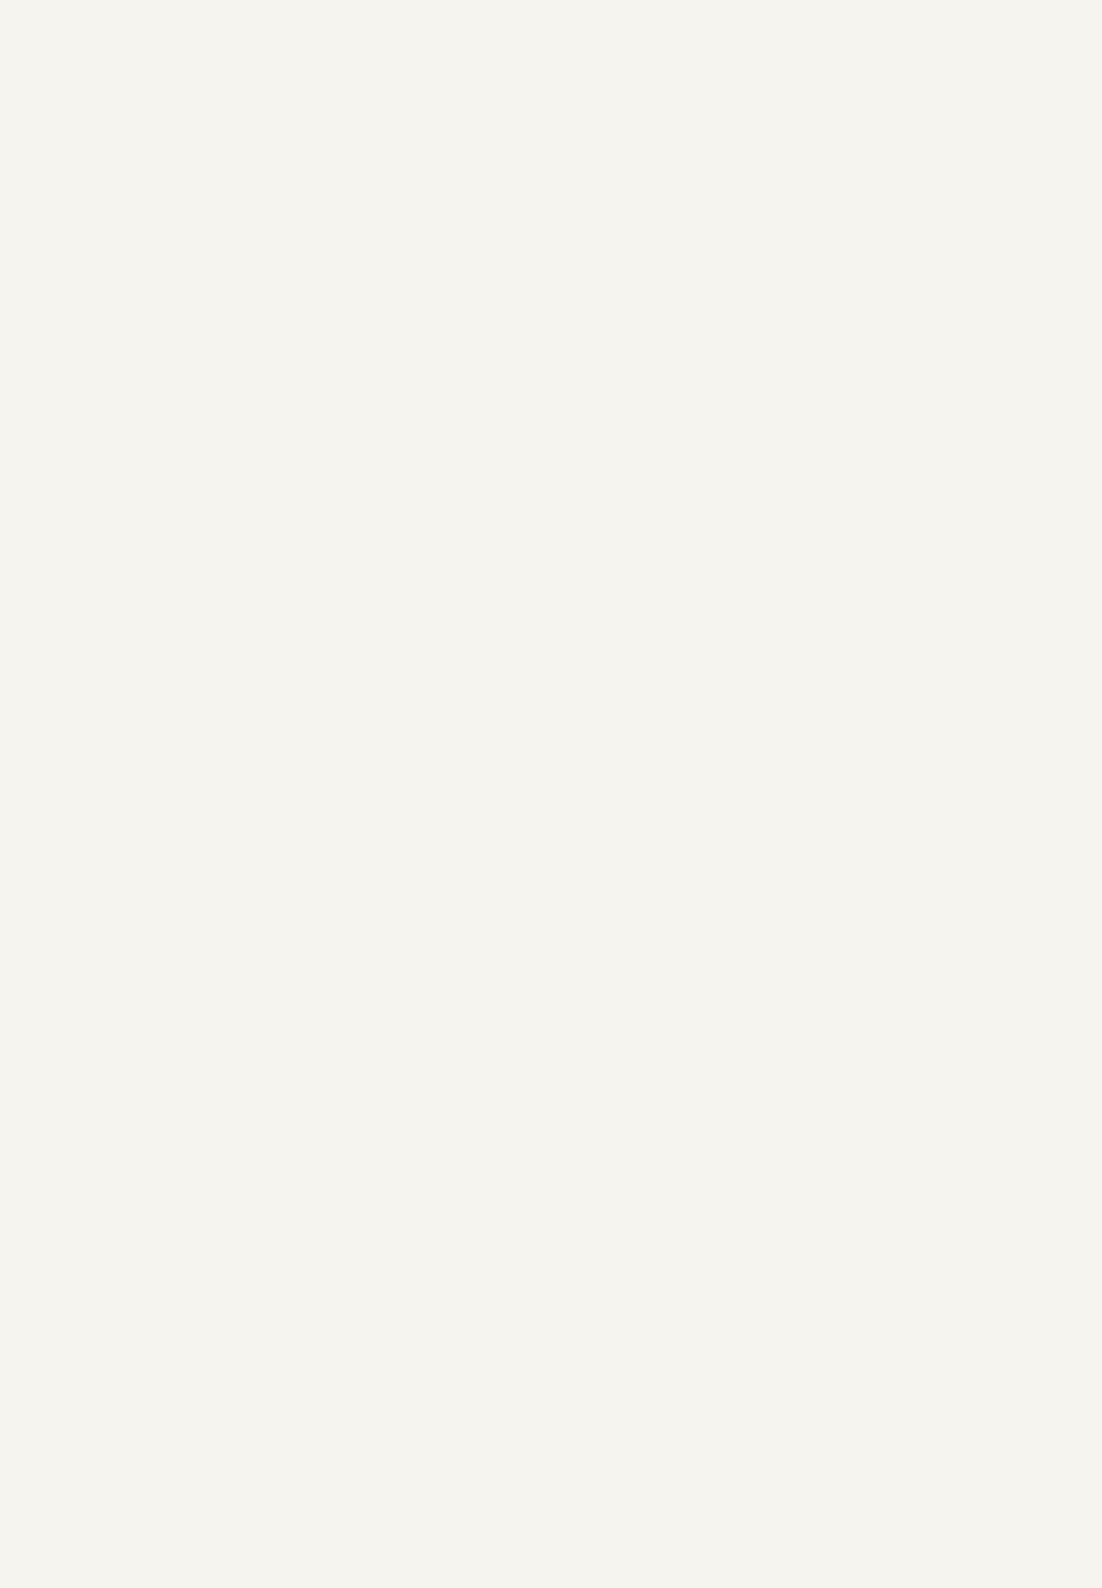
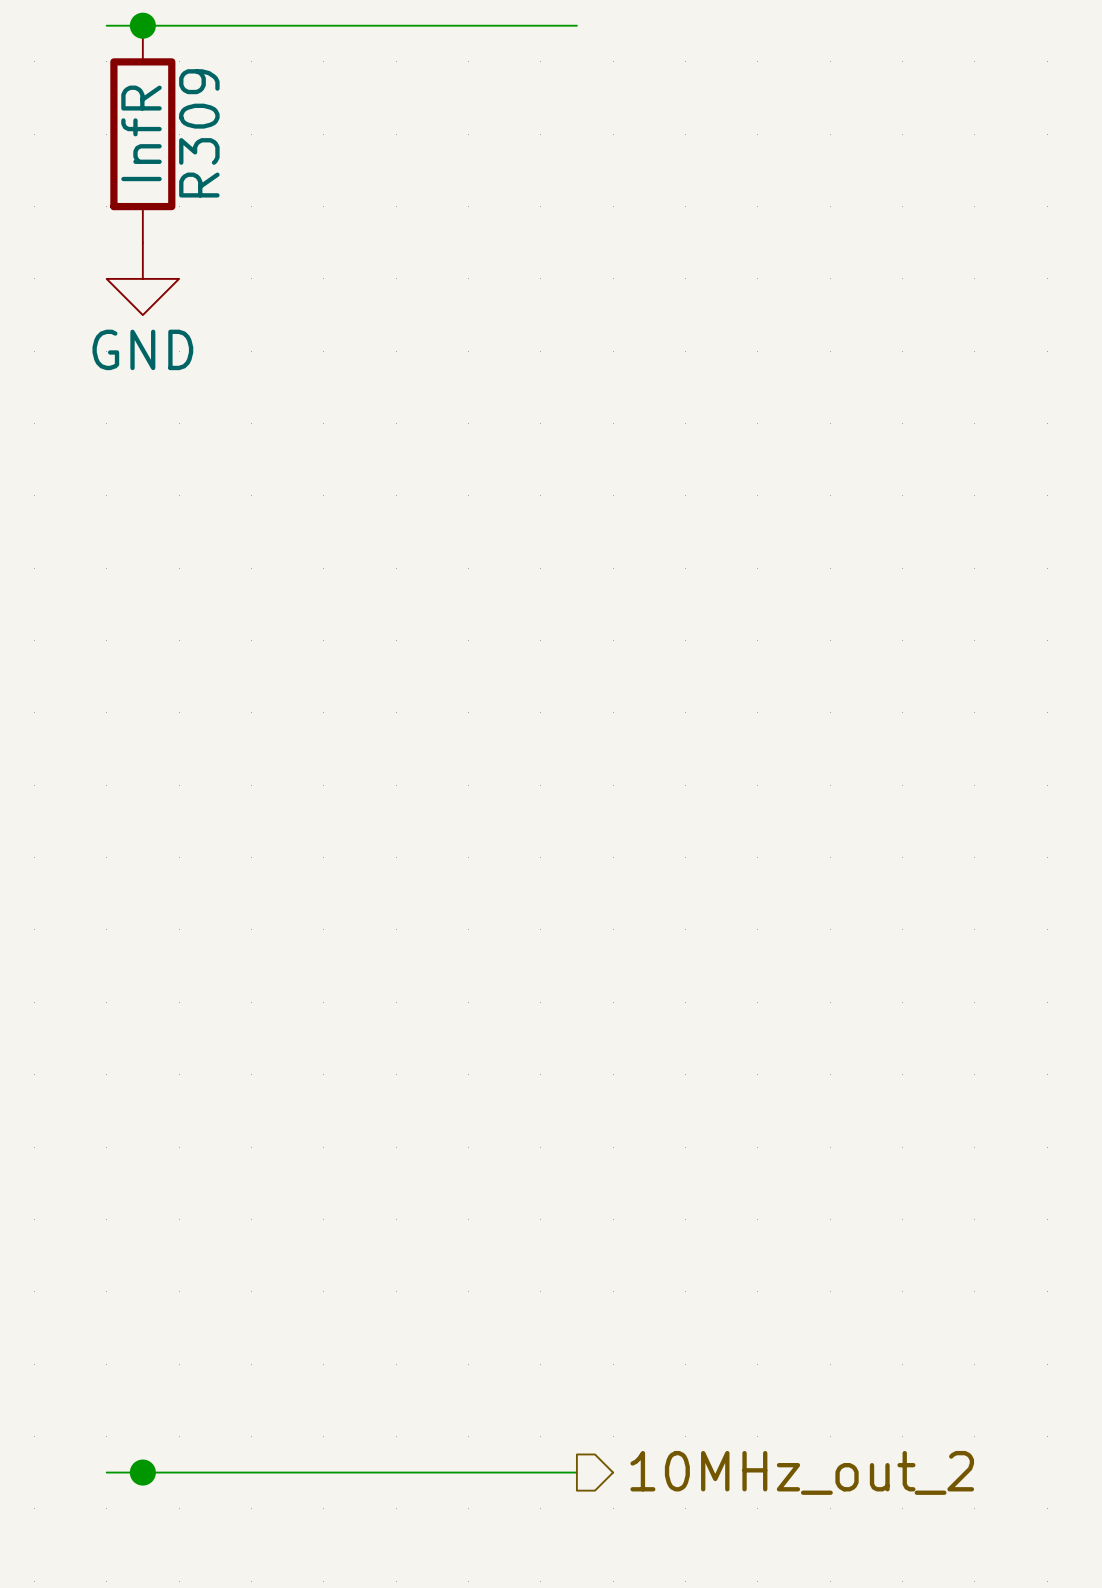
wire: none -> (106, 25) (576, 25)
junction: none -> (142, 25)
R309: none -> InfR (142, 134)
power symbol: none -> GND (142, 278)
wire: none -> (106, 1472) (576, 1472)
junction: none -> (142, 1472)
hierarchical label: none -> 10MHz_out_2 (802, 1472)

